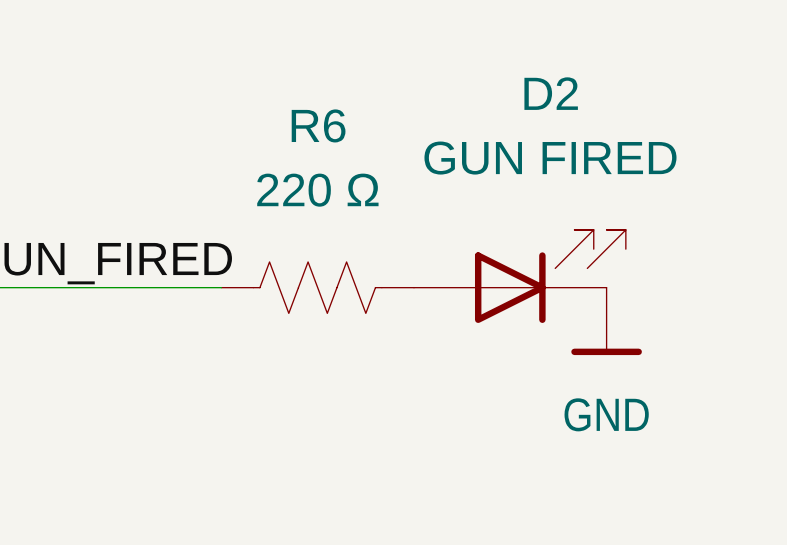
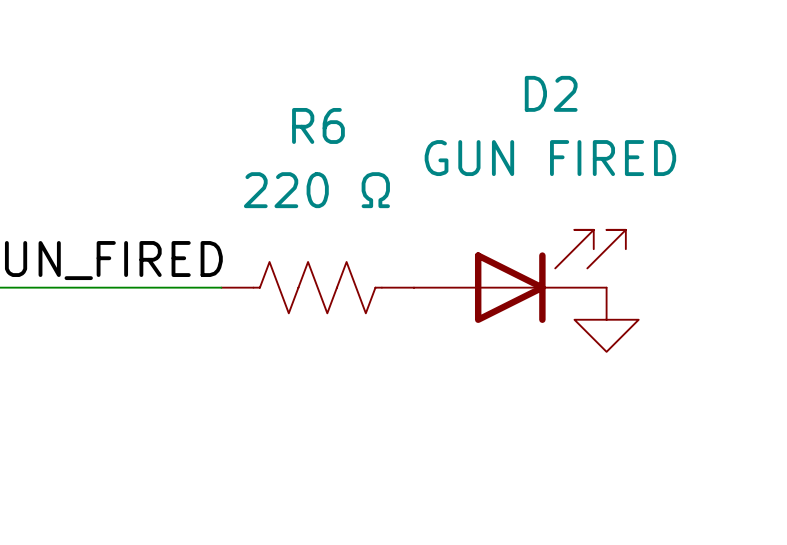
power symbol shape: [571, 287, 642, 356] -> [574, 287, 639, 352]
power symbol text: GND (606, 414) -> none

